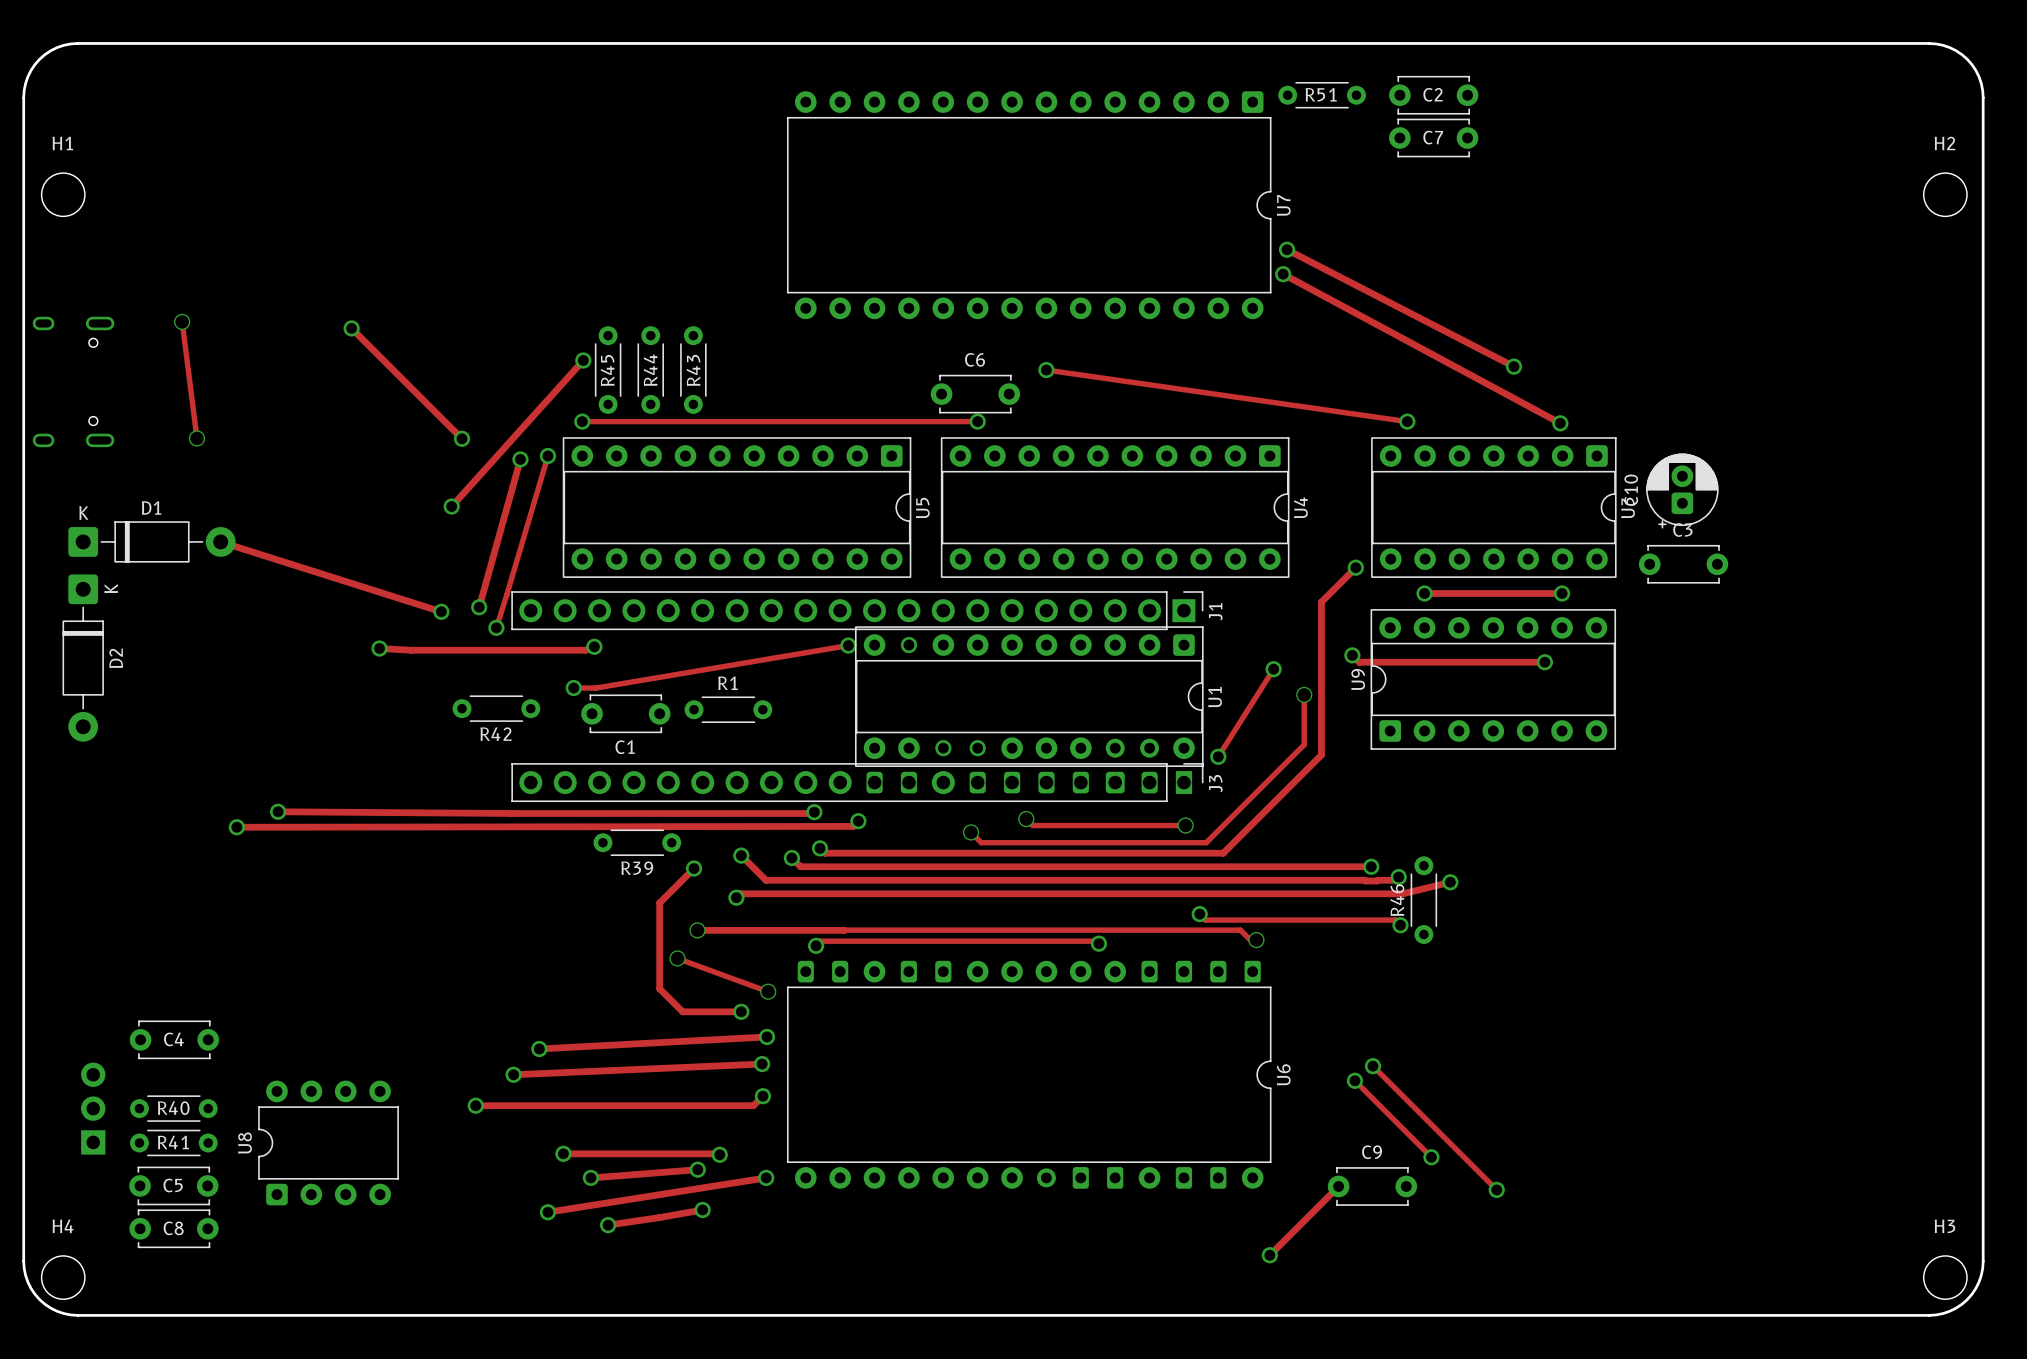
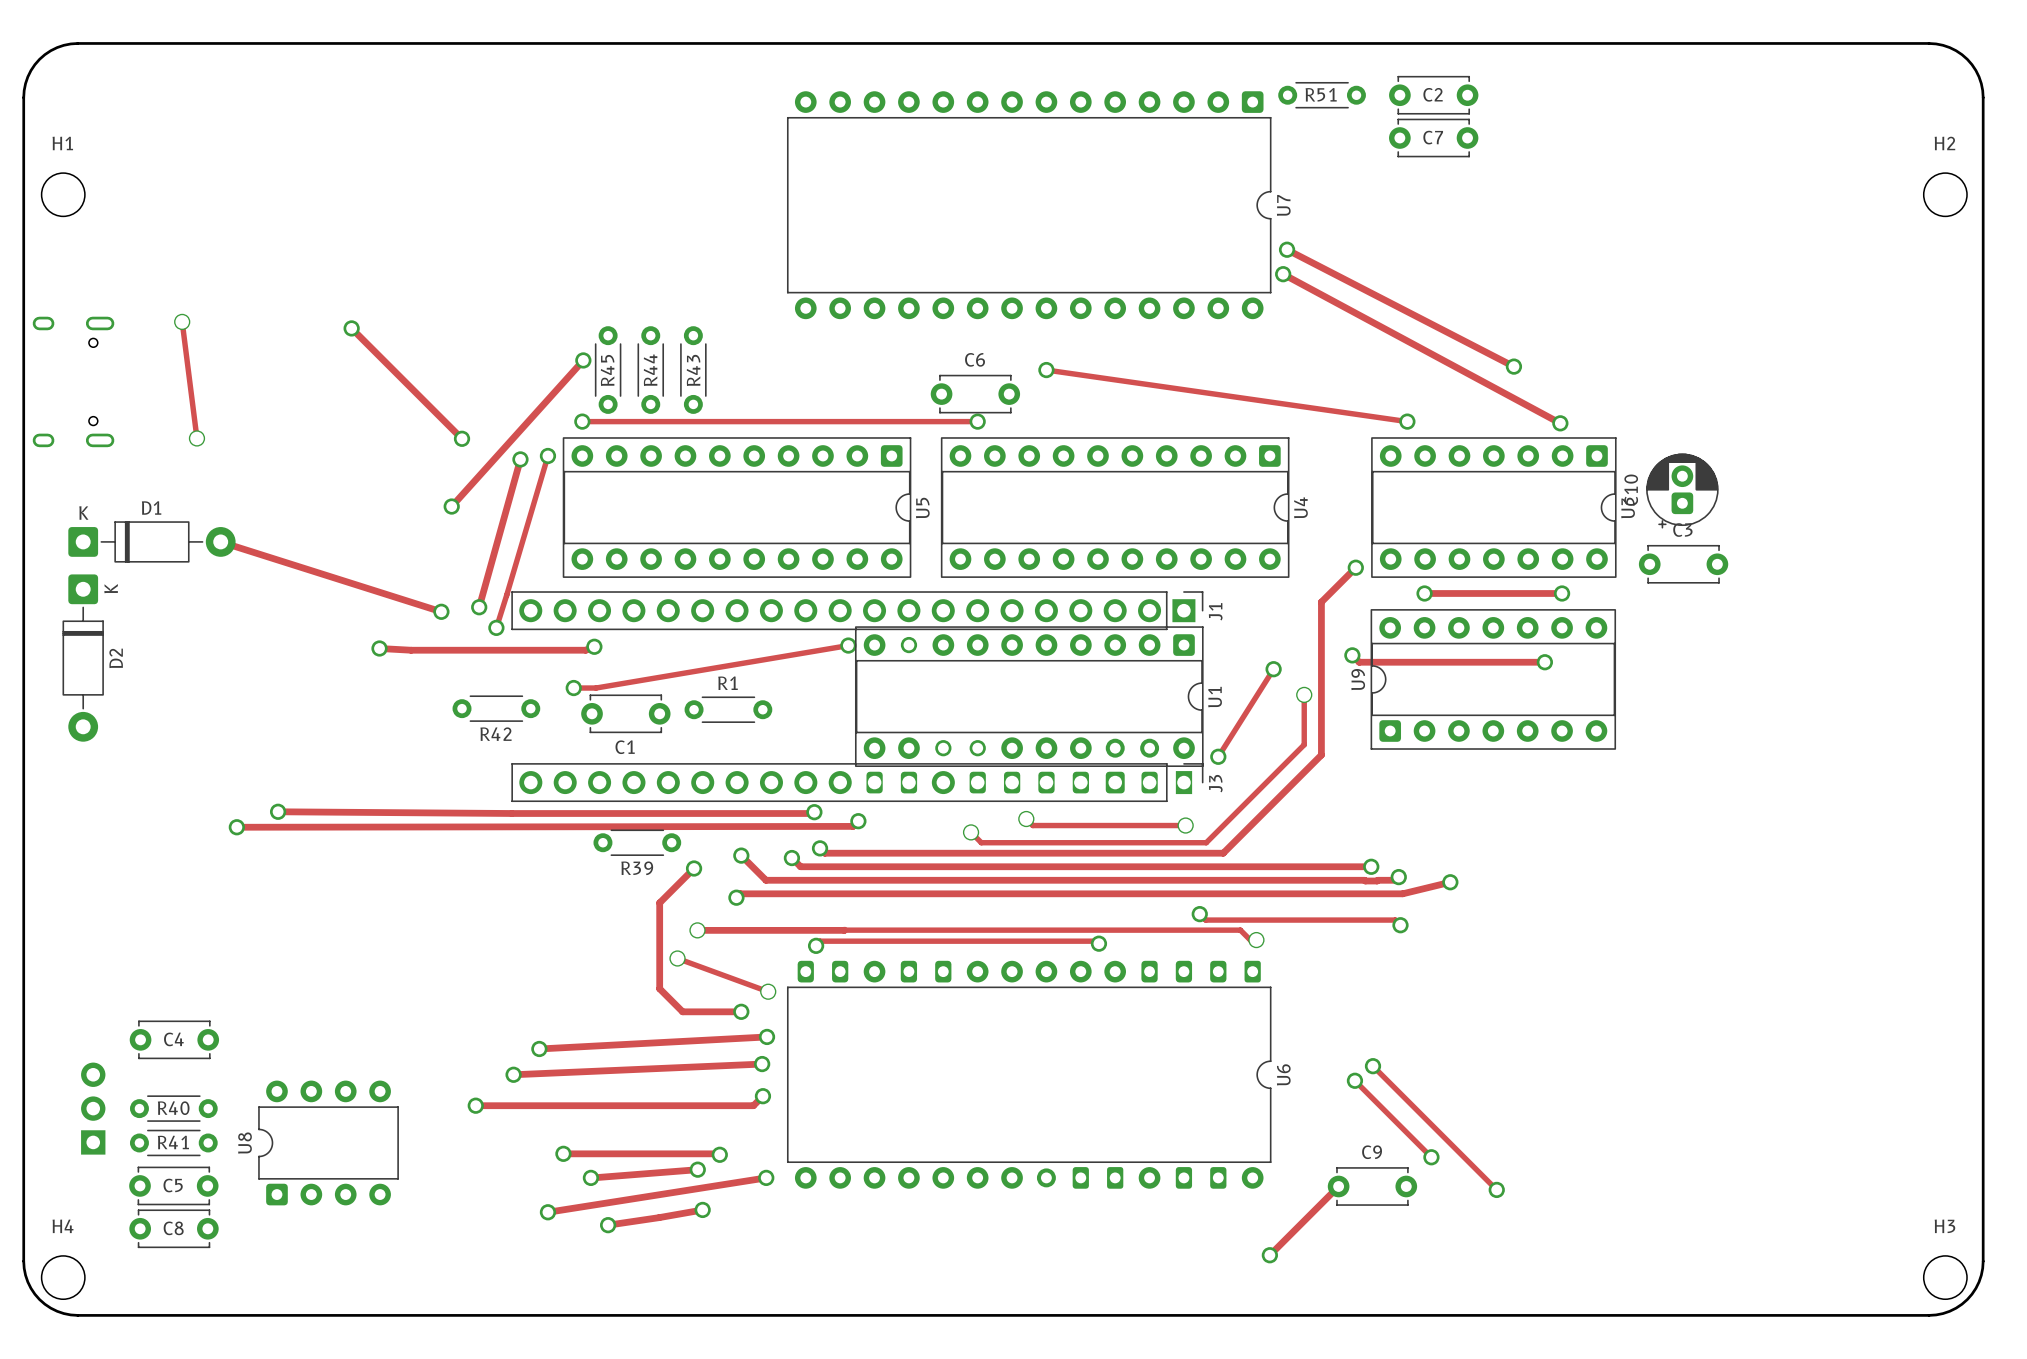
R46: (1423, 900) -> none

